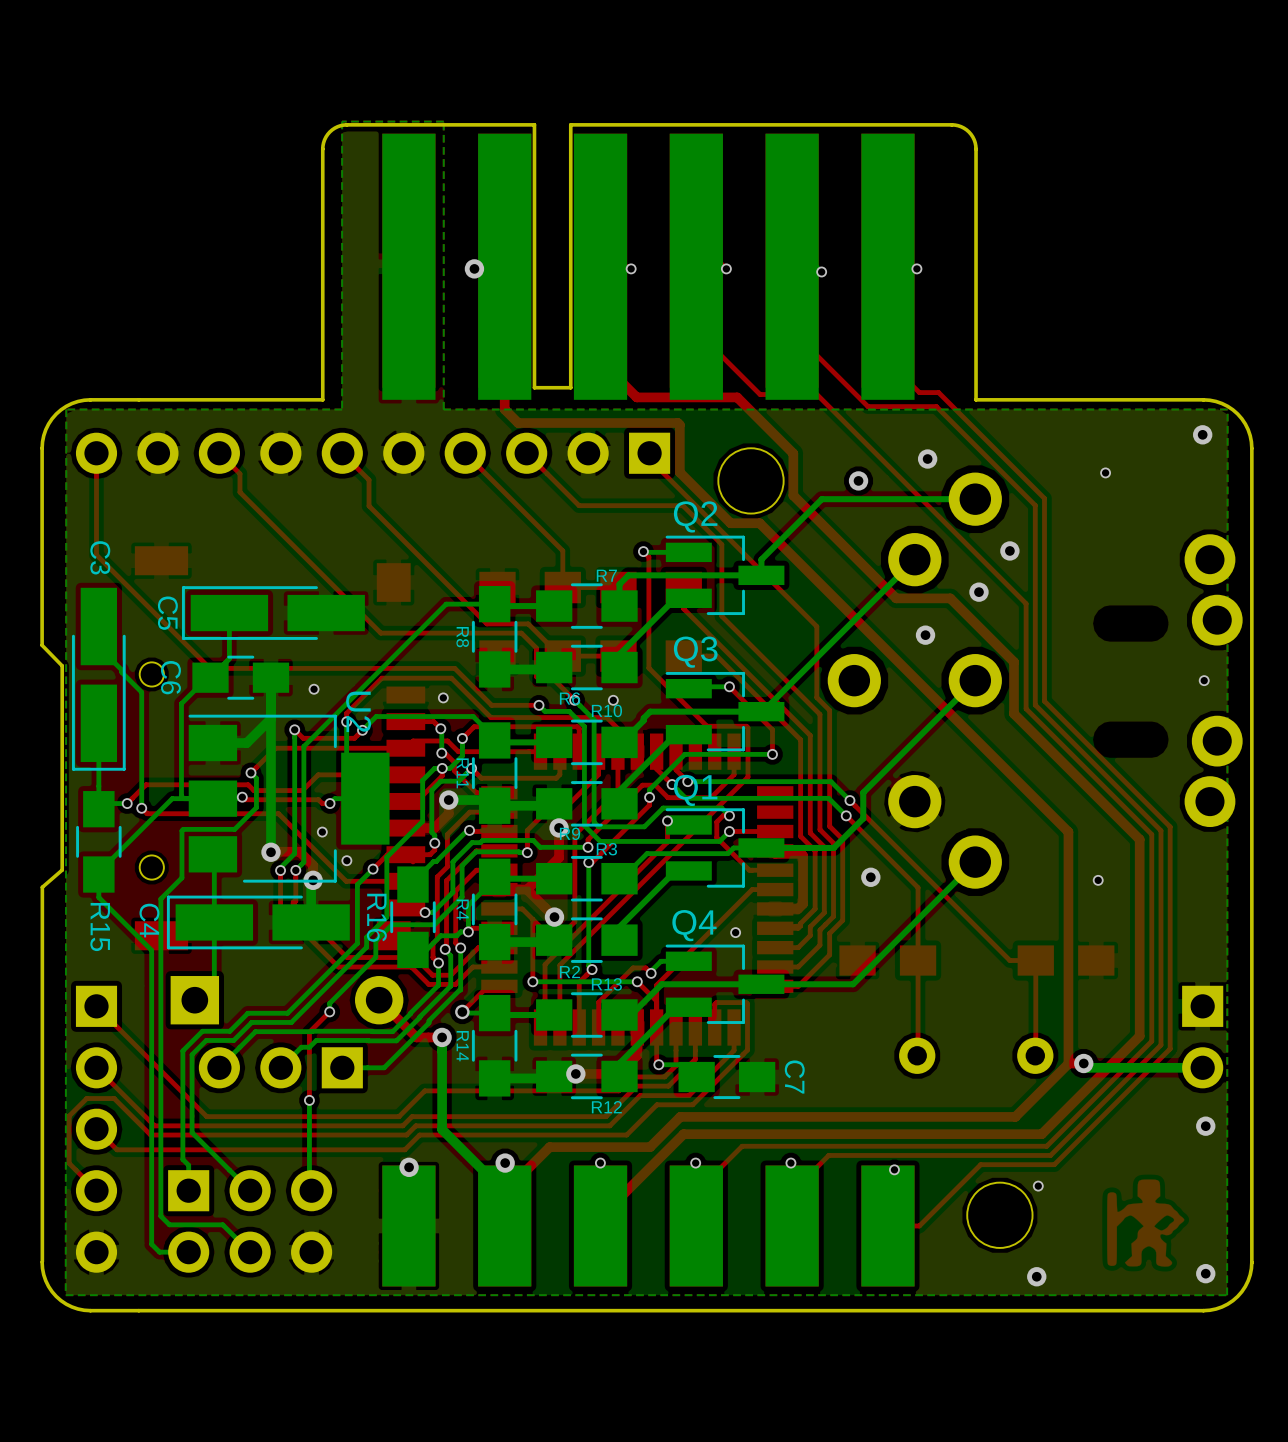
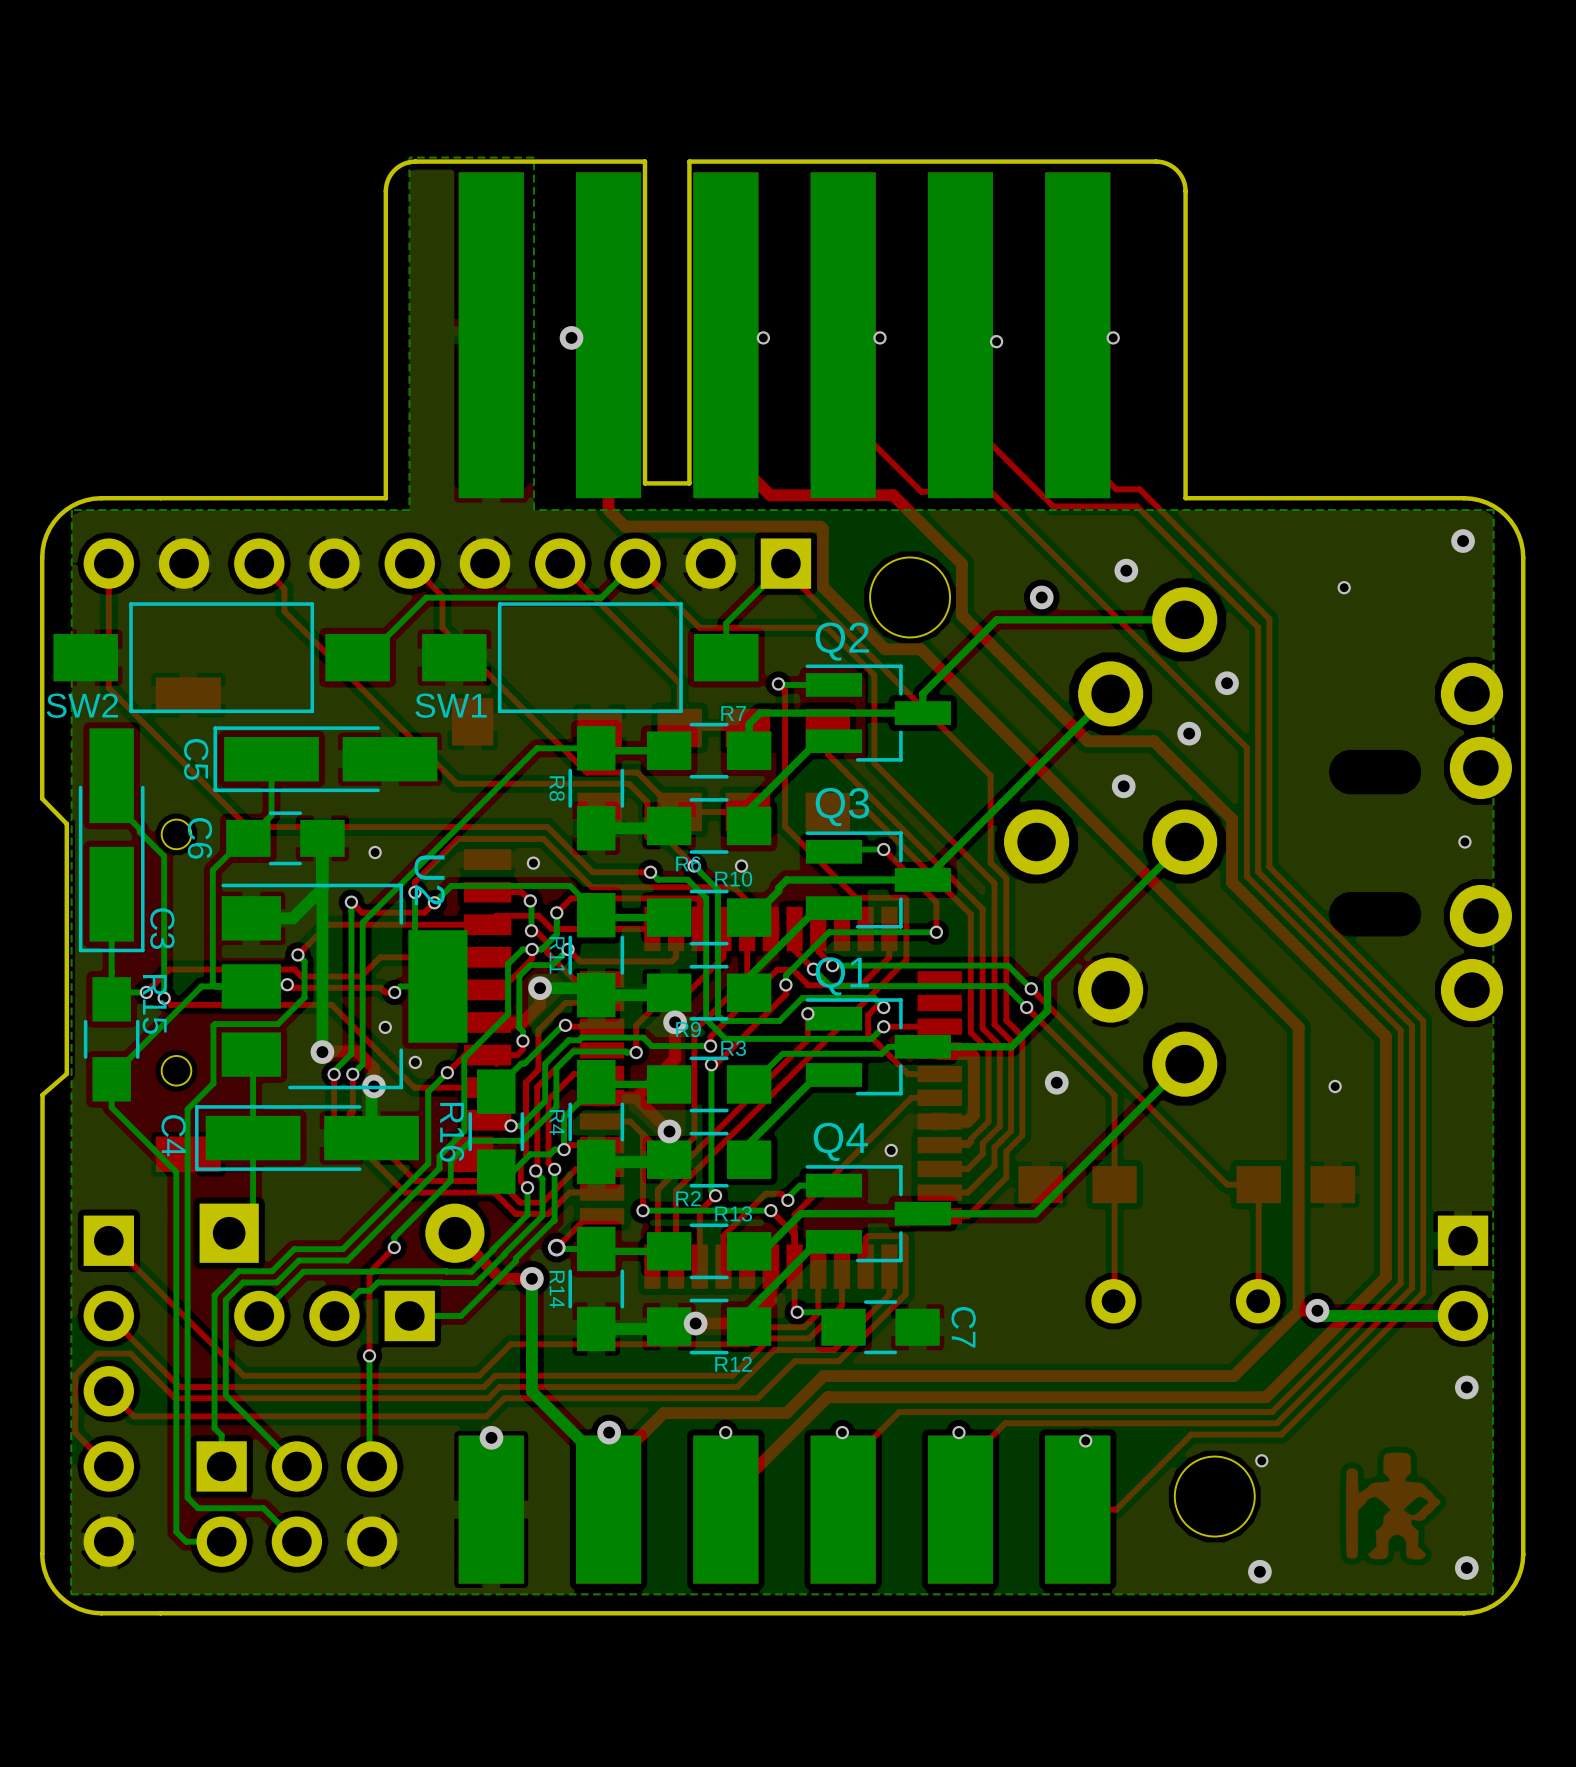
bottom track: none -> (635, 563) (601, 597) (426, 597) (366, 657) (357, 657)
bottom track: none -> (785, 563) (726, 623) (726, 657)
SW2: none -> (221, 657)
SW1: none -> (590, 657)
C3 name position: C3 (100, 557) -> C3 (162, 928)
R15 name position: R15 (100, 927) -> R15 (154, 1004)

